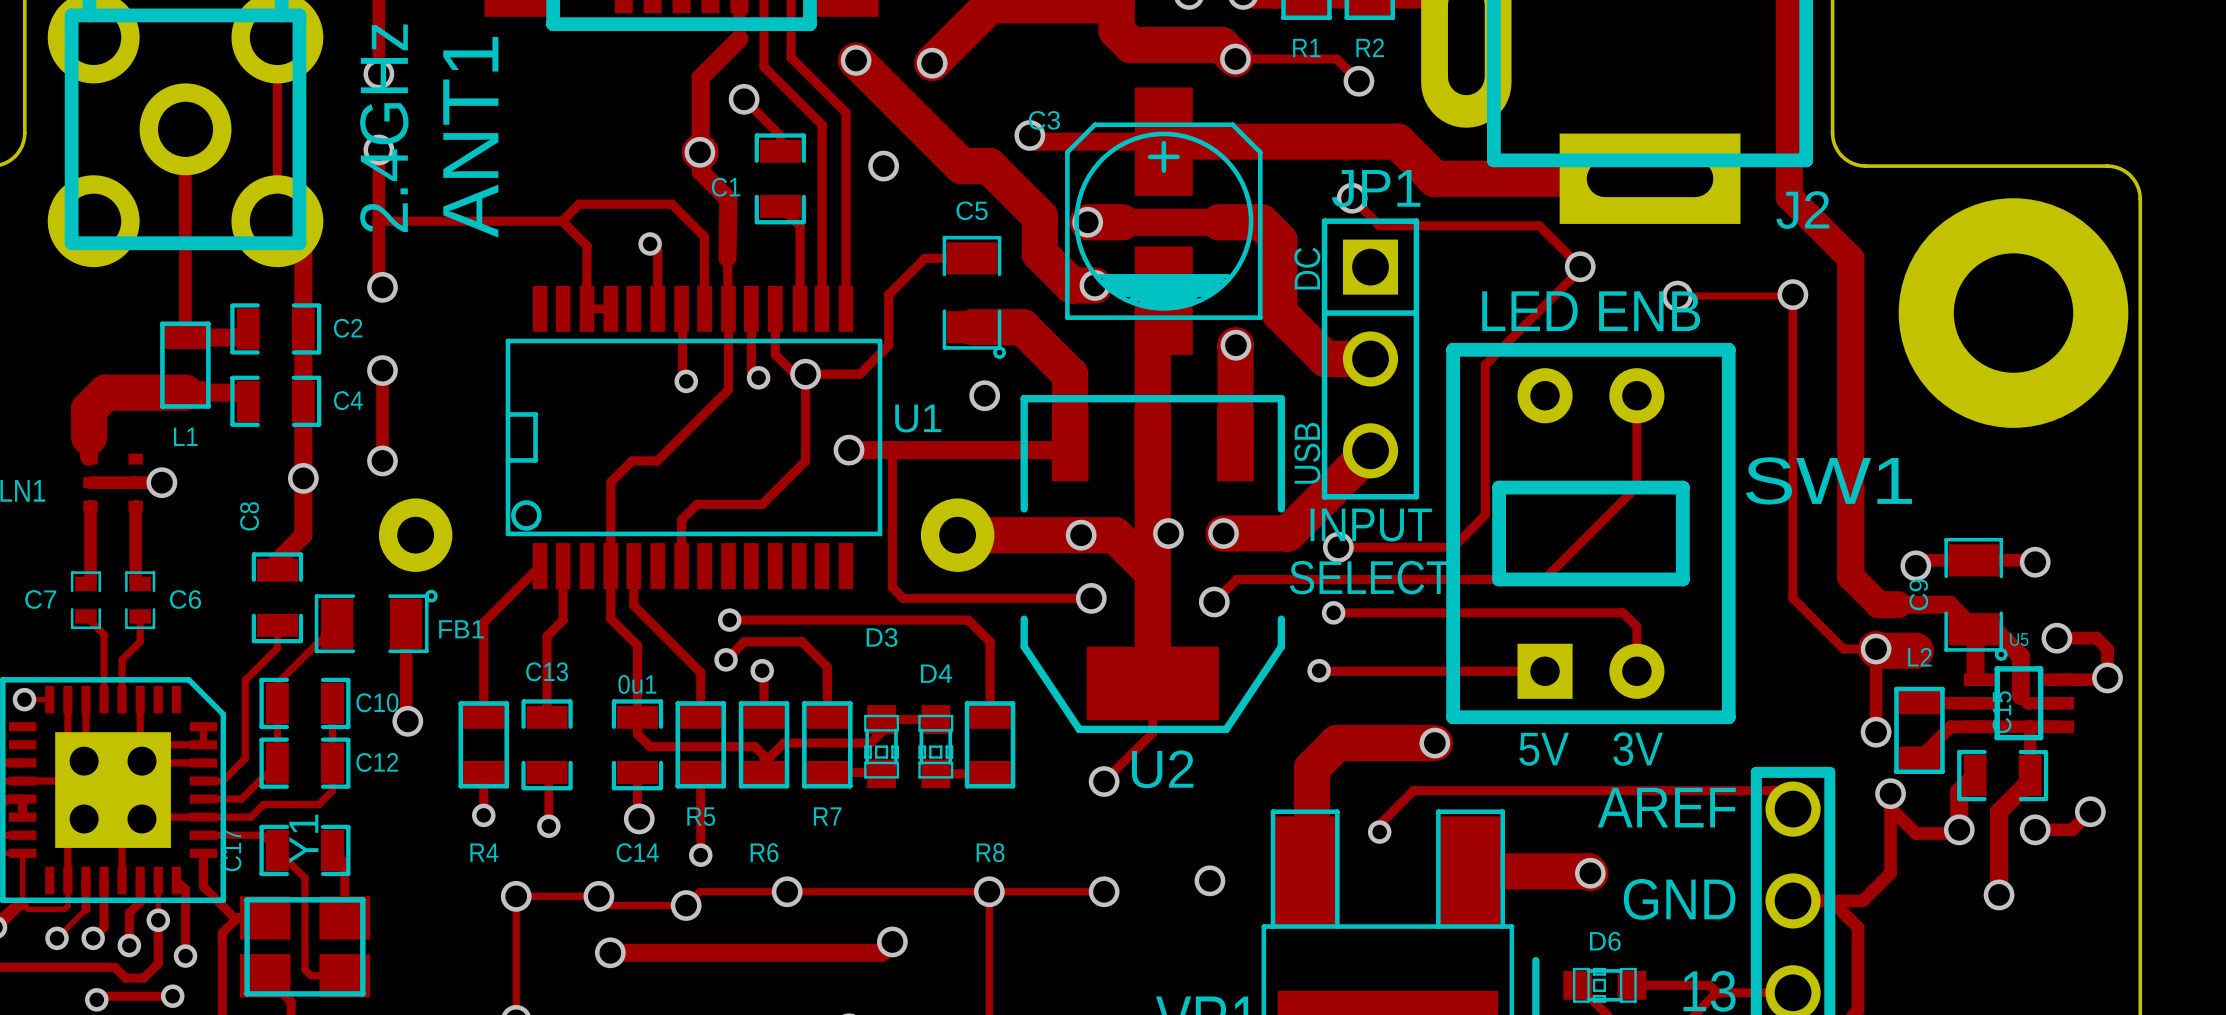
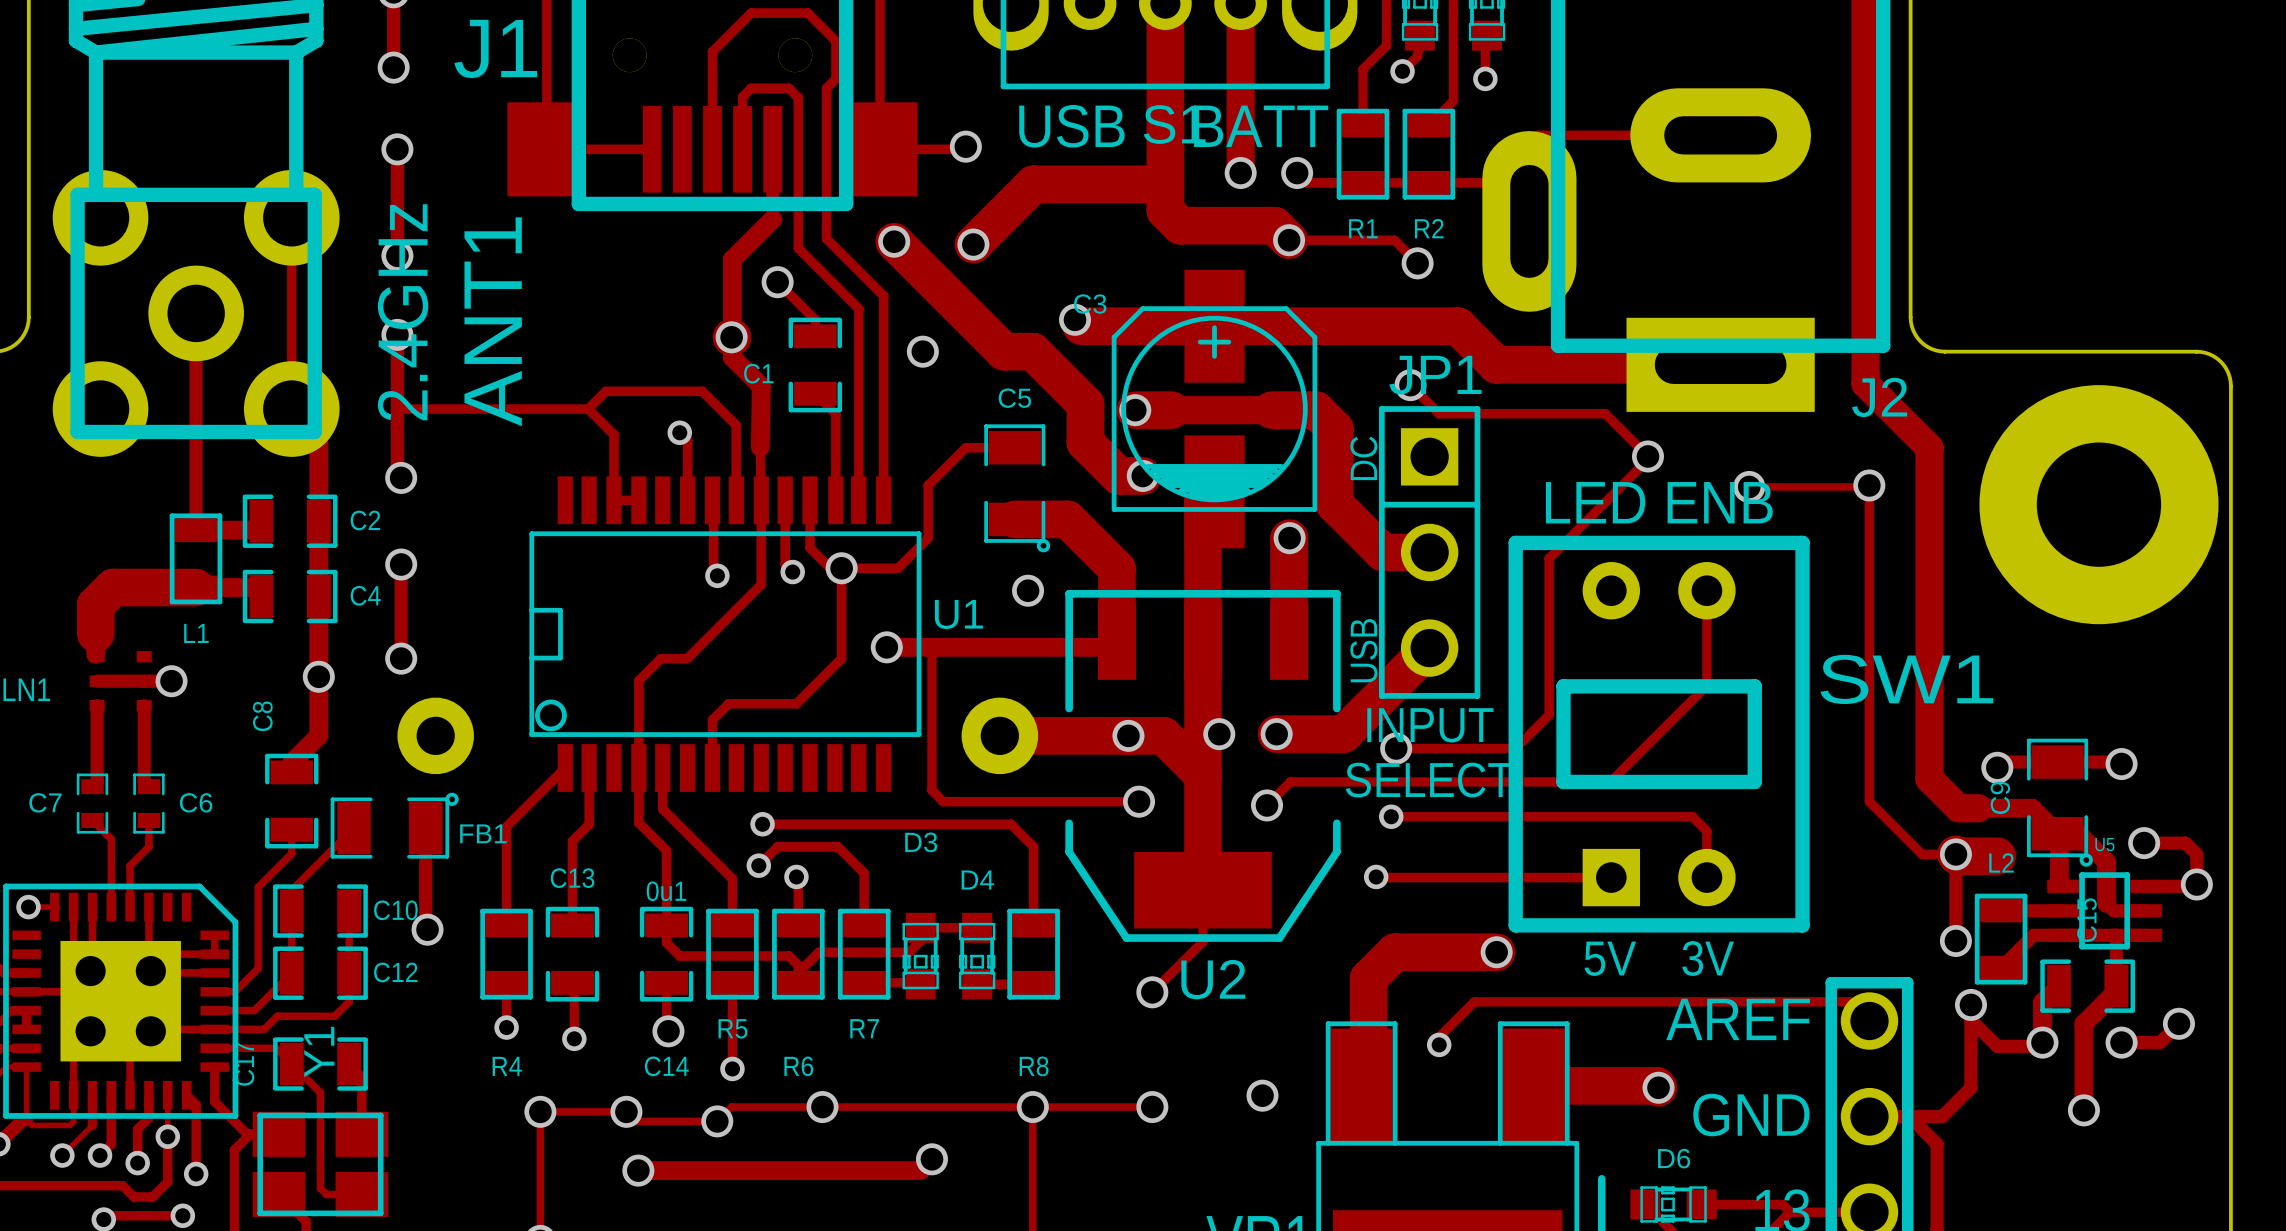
track width: thin (1036, 141) (1163, 141) -> thick (1081, 326) (1214, 326)

